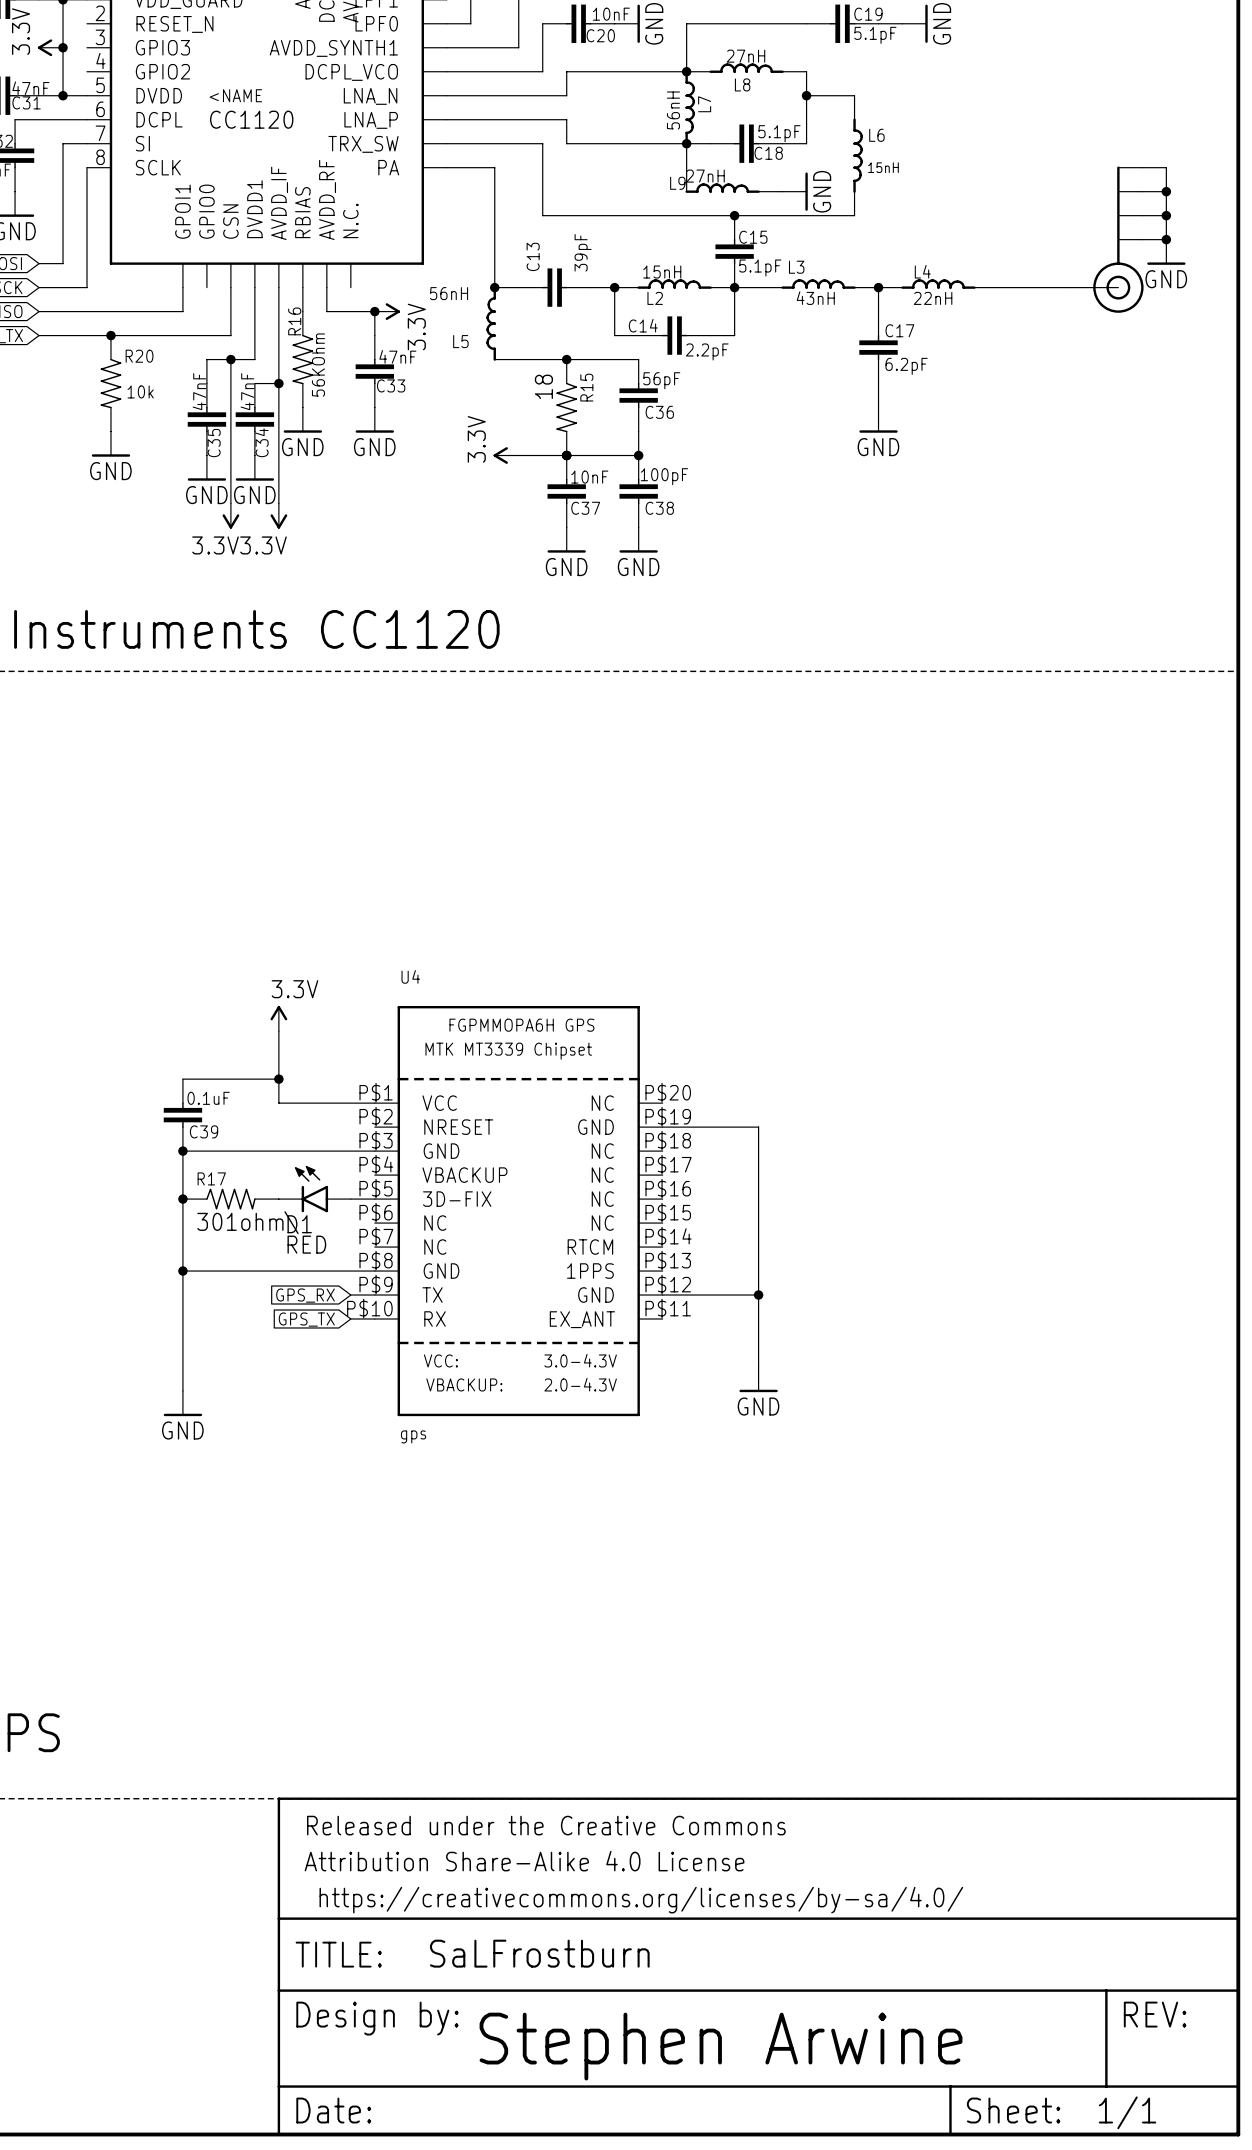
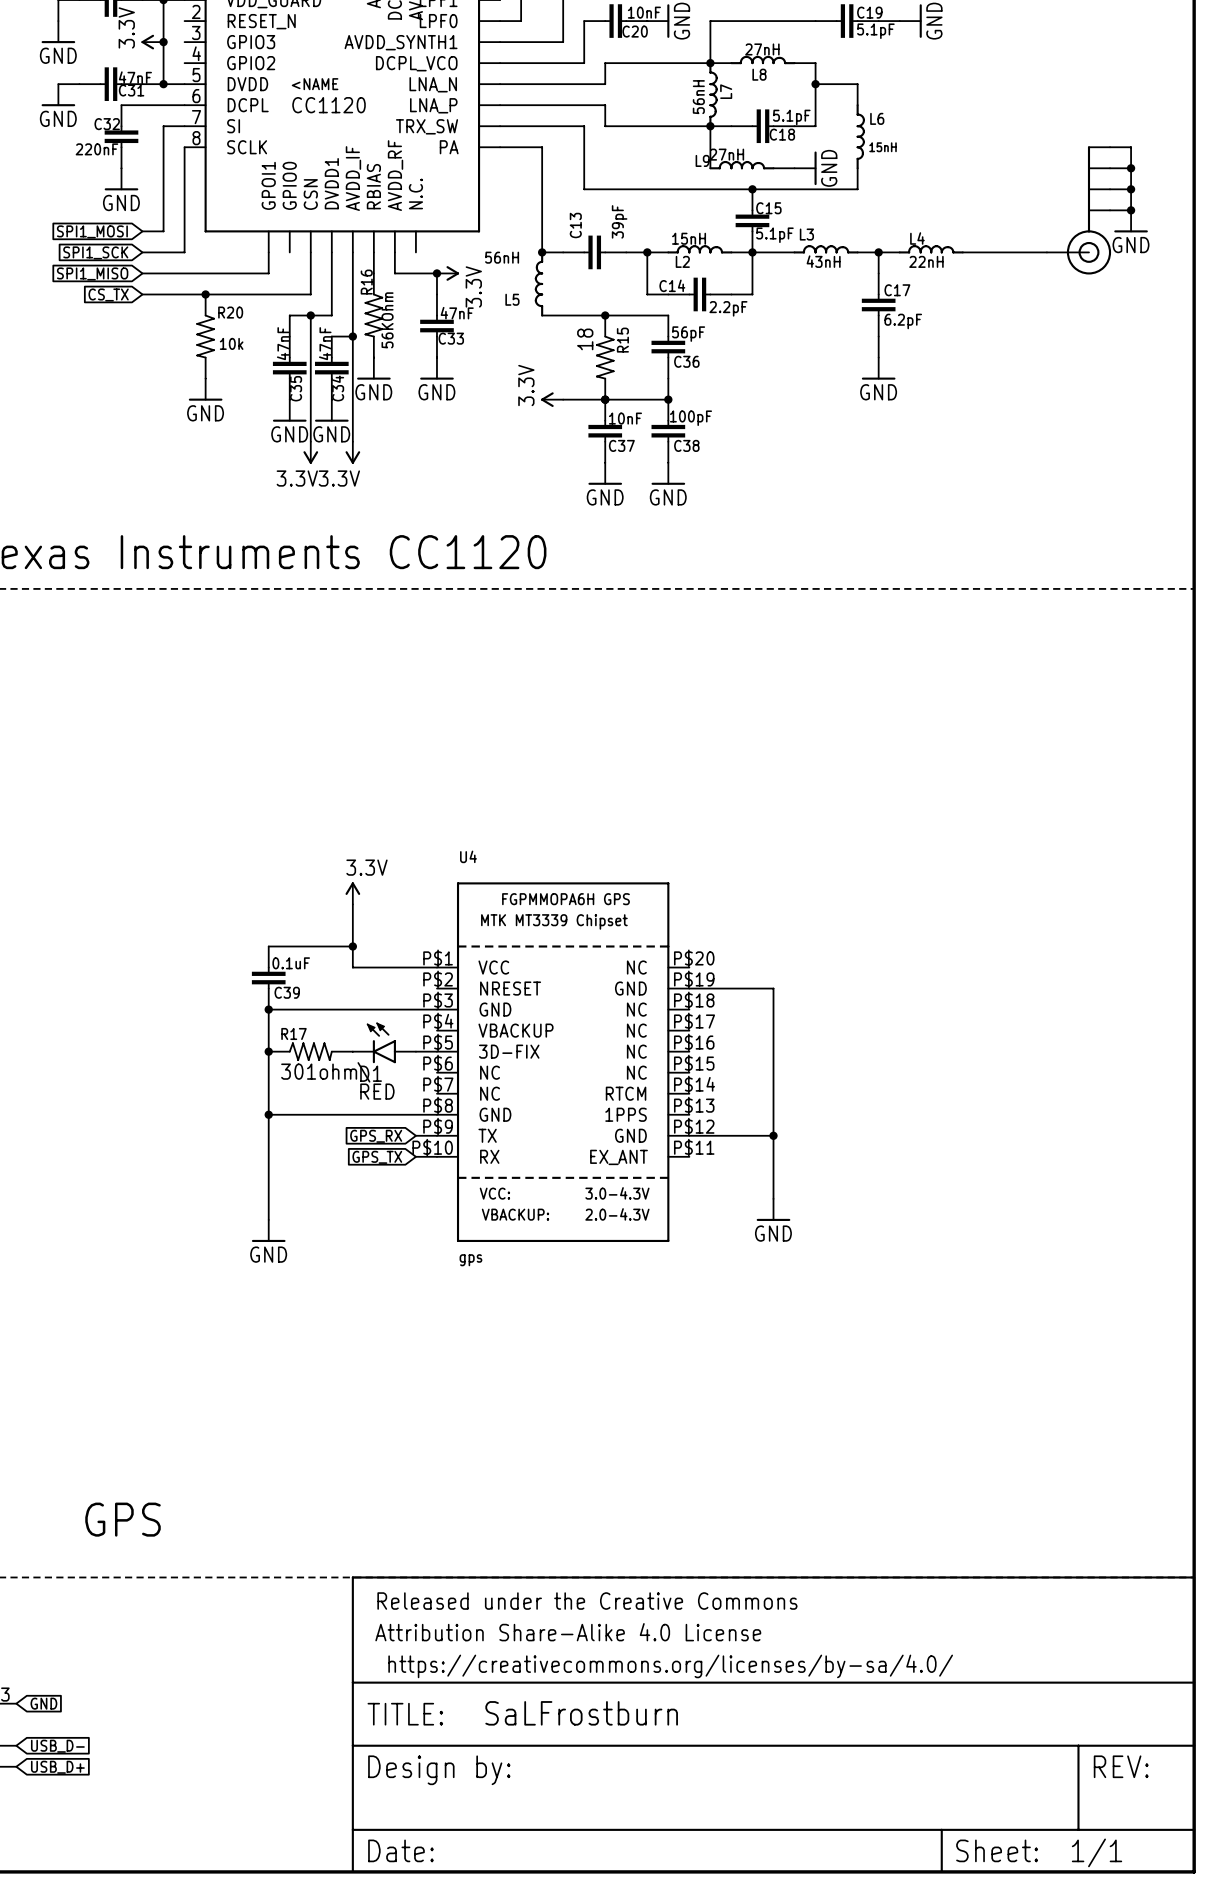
text: Stephen Arwine (721, 2046) -> none

